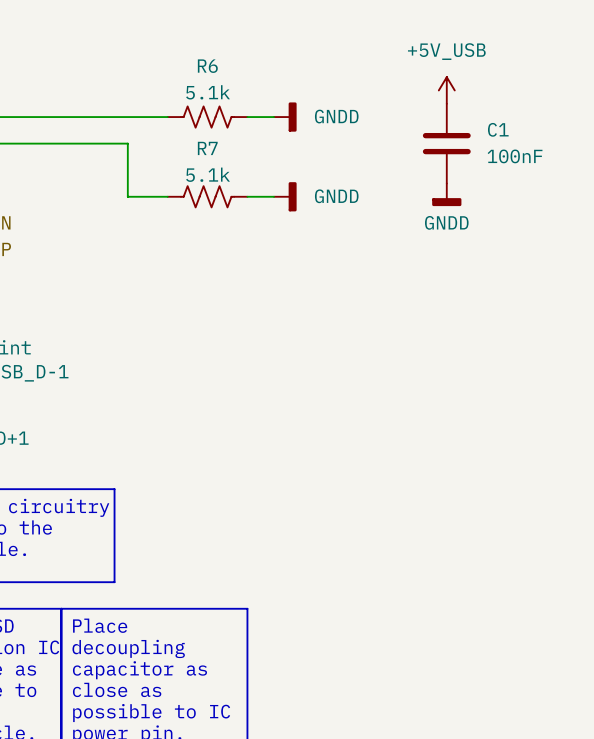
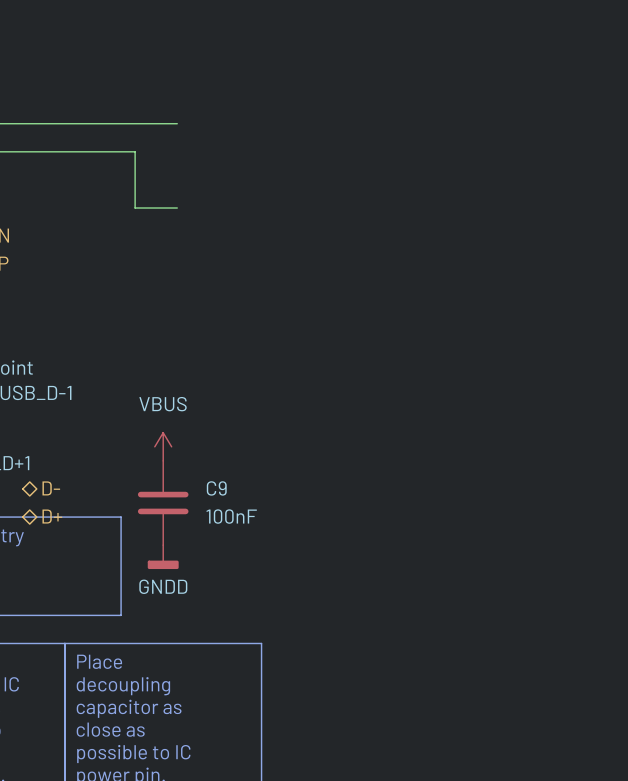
power symbol: +5V_USB (446, 90) -> none
R6: 5.1k (207, 117) -> none
wire: (247, 117) (274, 117) -> none
power symbol: GNDD (285, 117) -> none
C1: 100nF (446, 143) -> none
power symbol: GNDD (446, 194) -> none
R7: 5.1k (207, 196) -> none
wire: (247, 196) (274, 196) -> none
power symbol: GNDD (285, 196) -> none
power symbol: none -> VBUS (163, 446)
hierarchical label: none -> D- (51, 488)
C9: none -> 100nF (163, 503)
hierarchical label: none -> D+ (52, 516)
power symbol: none -> GNDD (163, 557)

